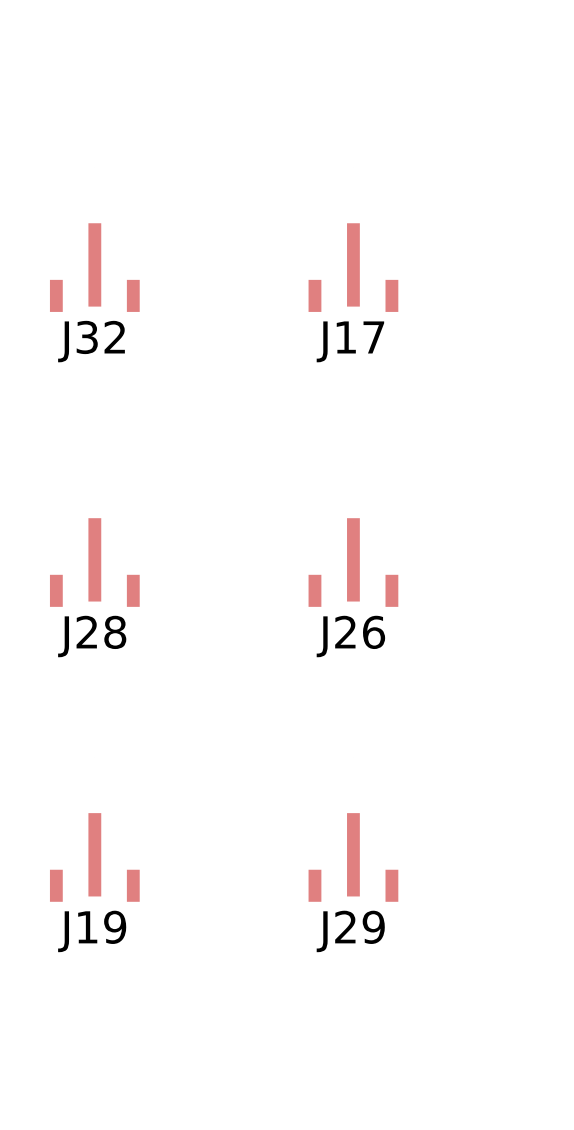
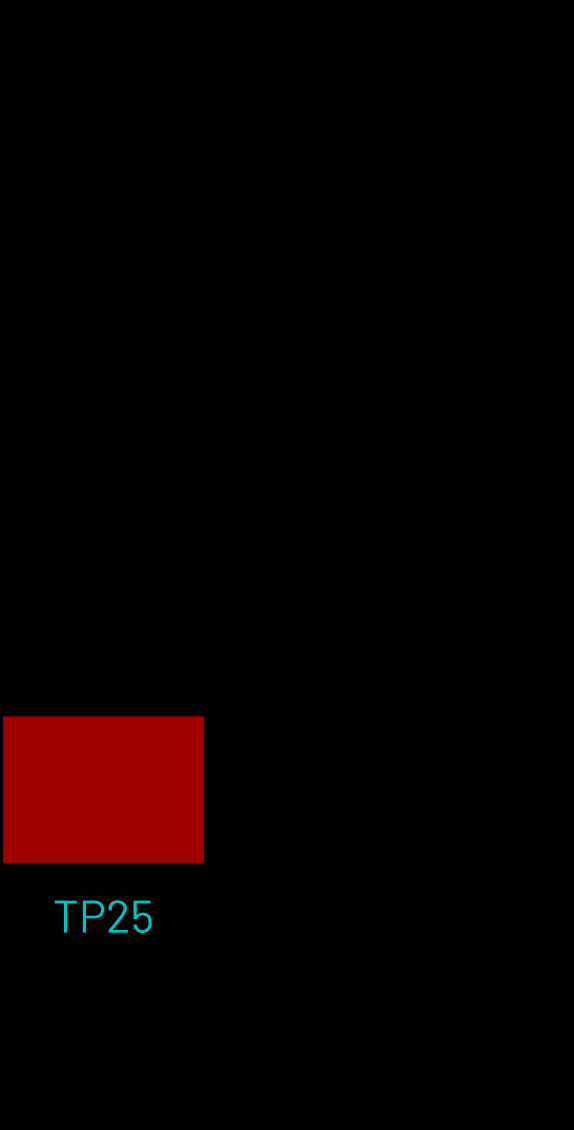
J32: (94, 239) -> none
J17: (353, 239) -> none
J28: (94, 534) -> none
J26: (353, 534) -> none
TP25: none -> (103, 789)
J19: (94, 829) -> none
J29: (353, 829) -> none

